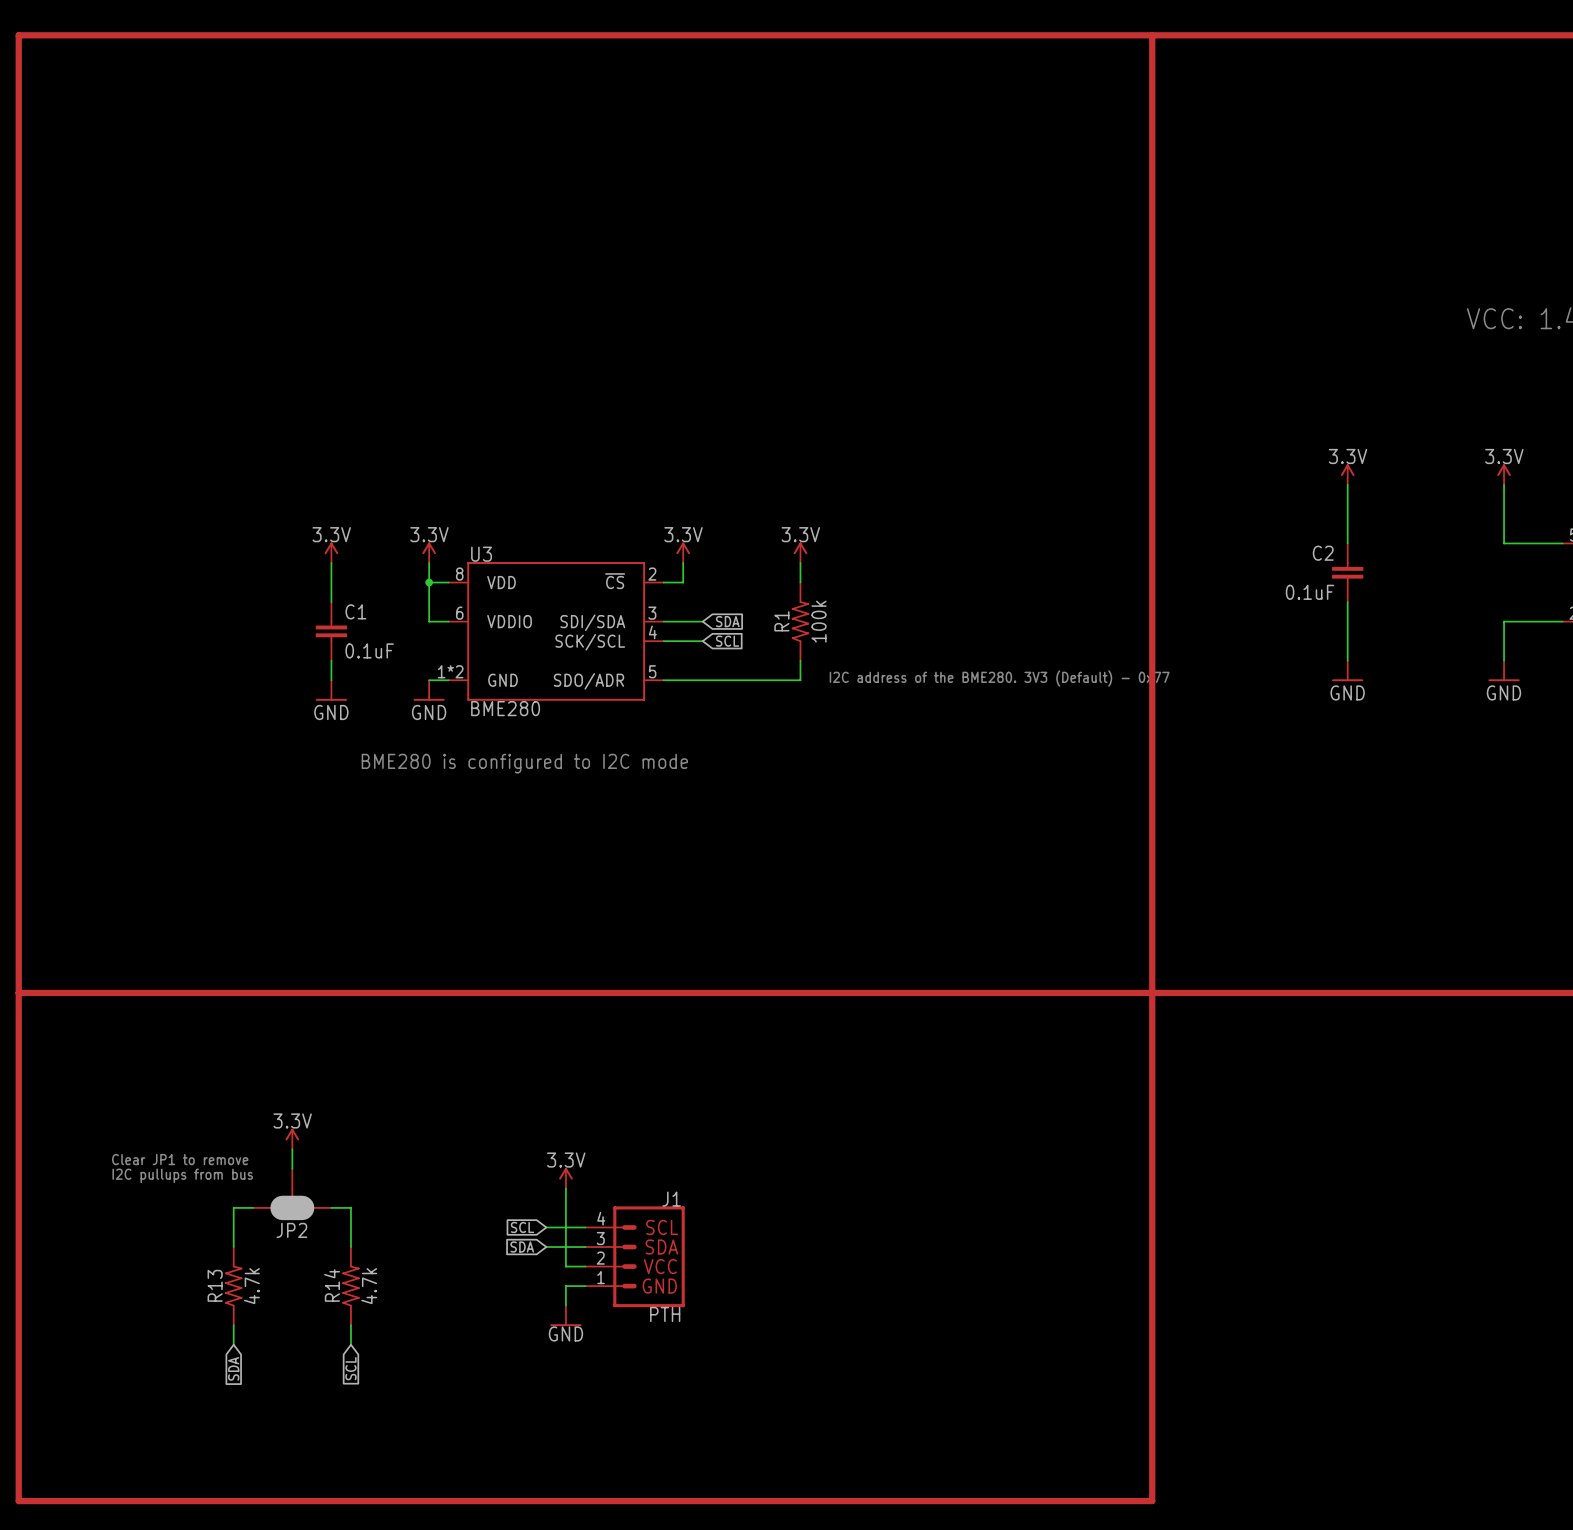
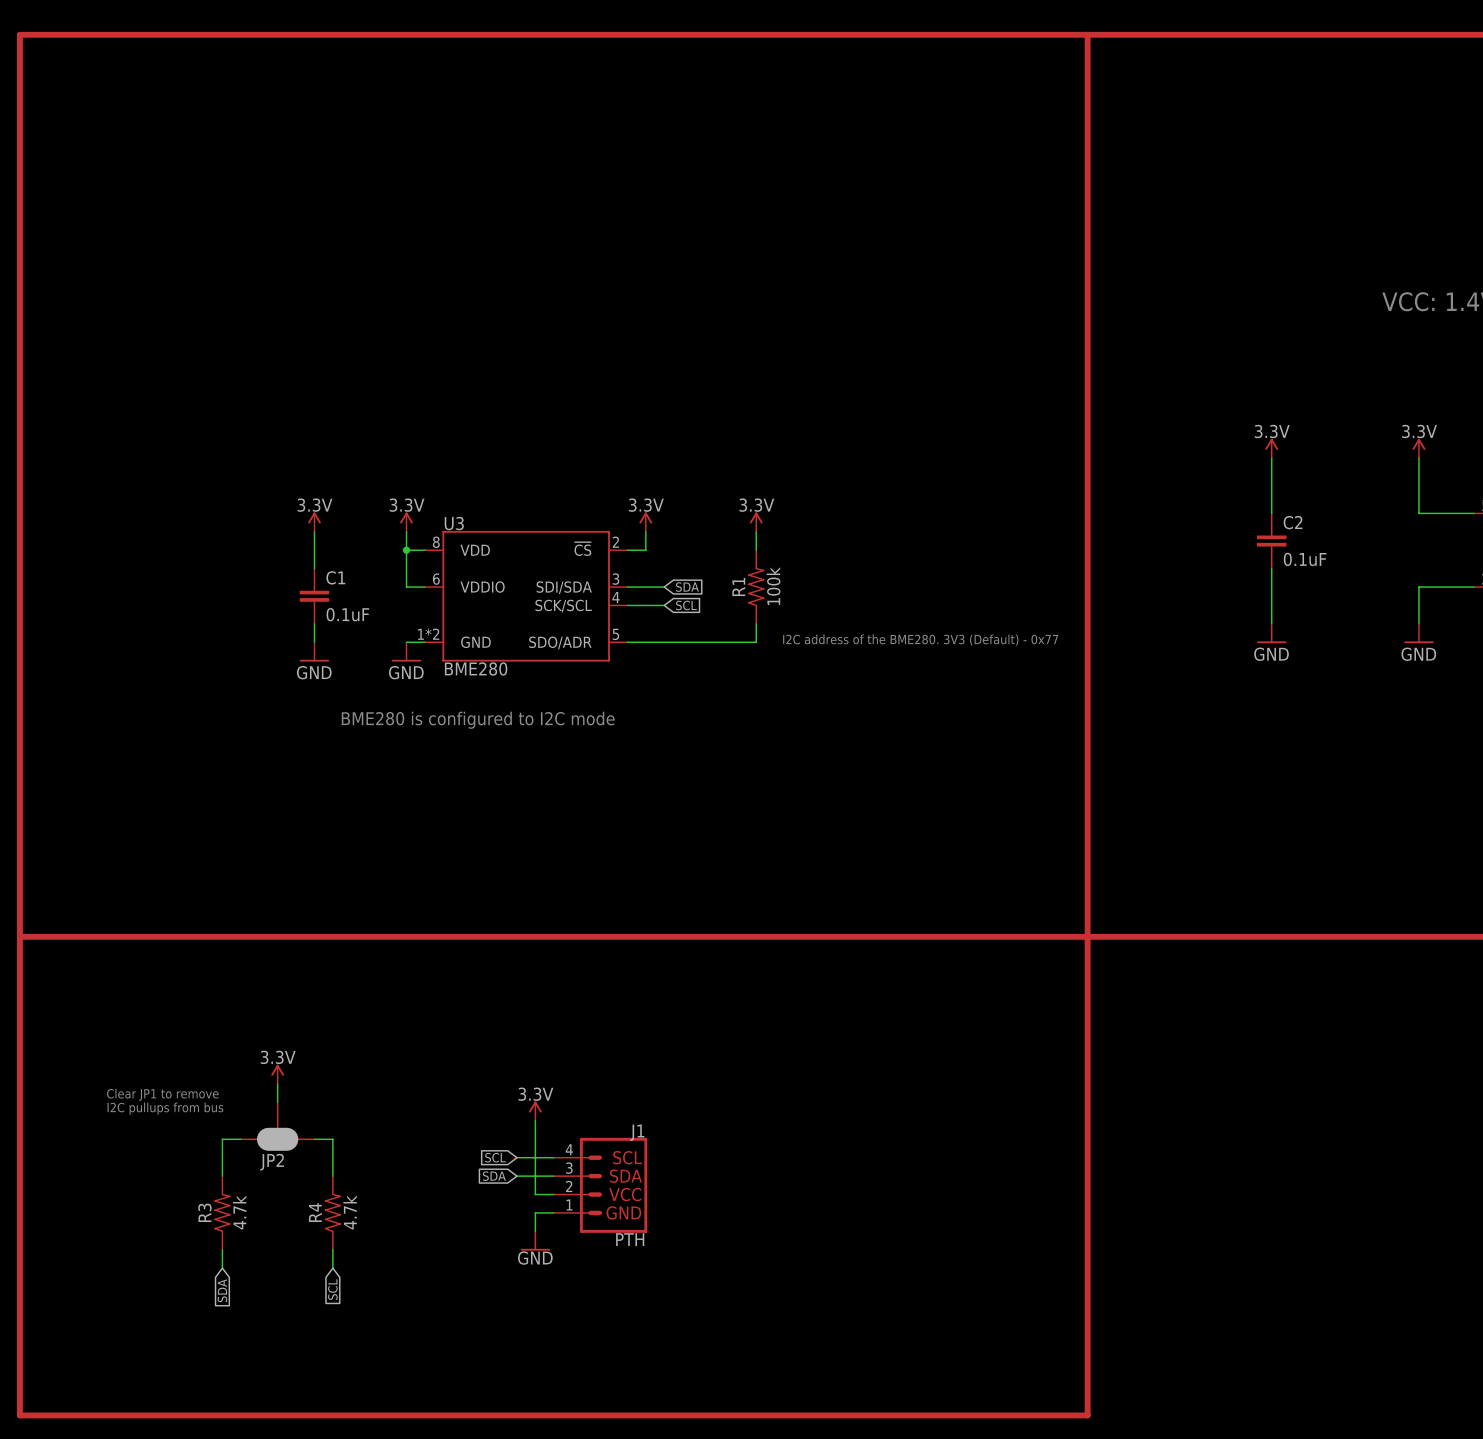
C2 name position: C2 (1323, 553) -> C2 (1293, 522)
C2 value position: 0.1uF (1310, 592) -> 0.1uF (1305, 559)
R13 name: R13 (215, 1285) -> R3 (204, 1212)
R14 name: R14 (332, 1285) -> R4 (315, 1212)

